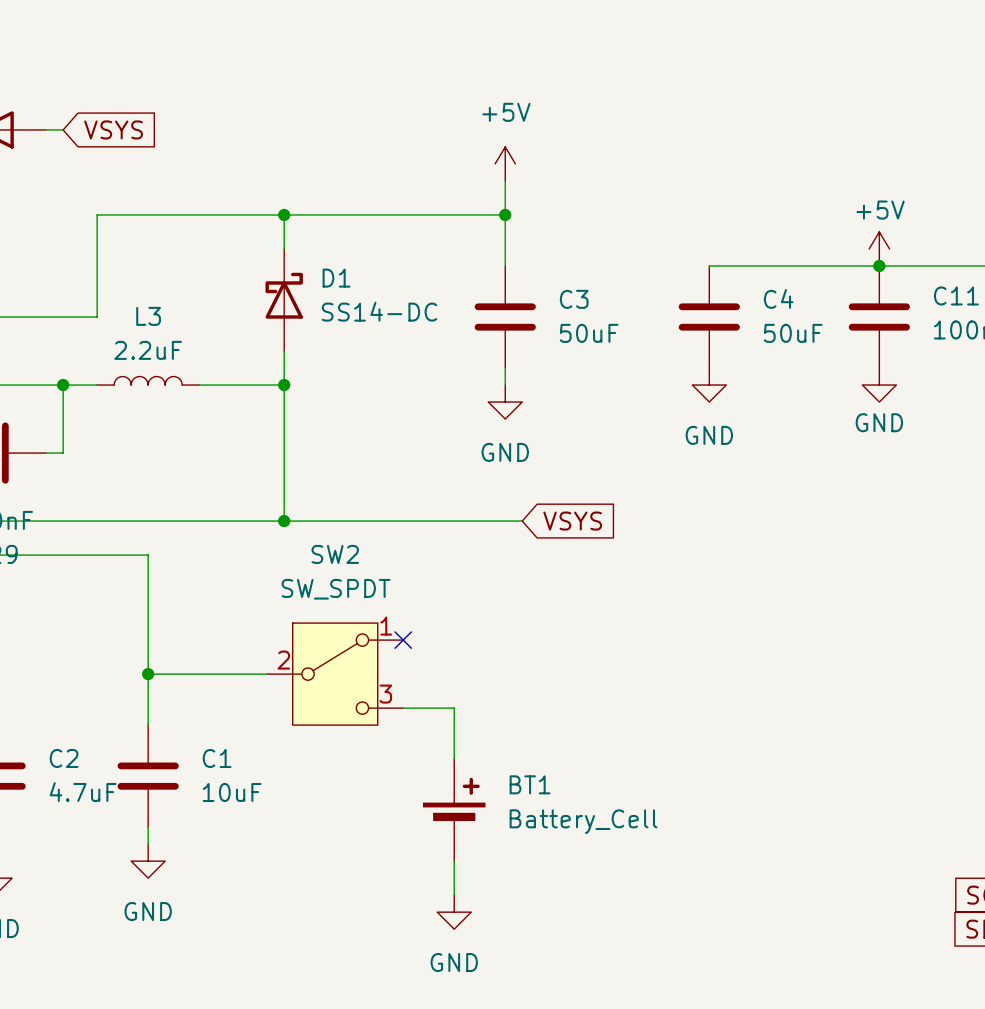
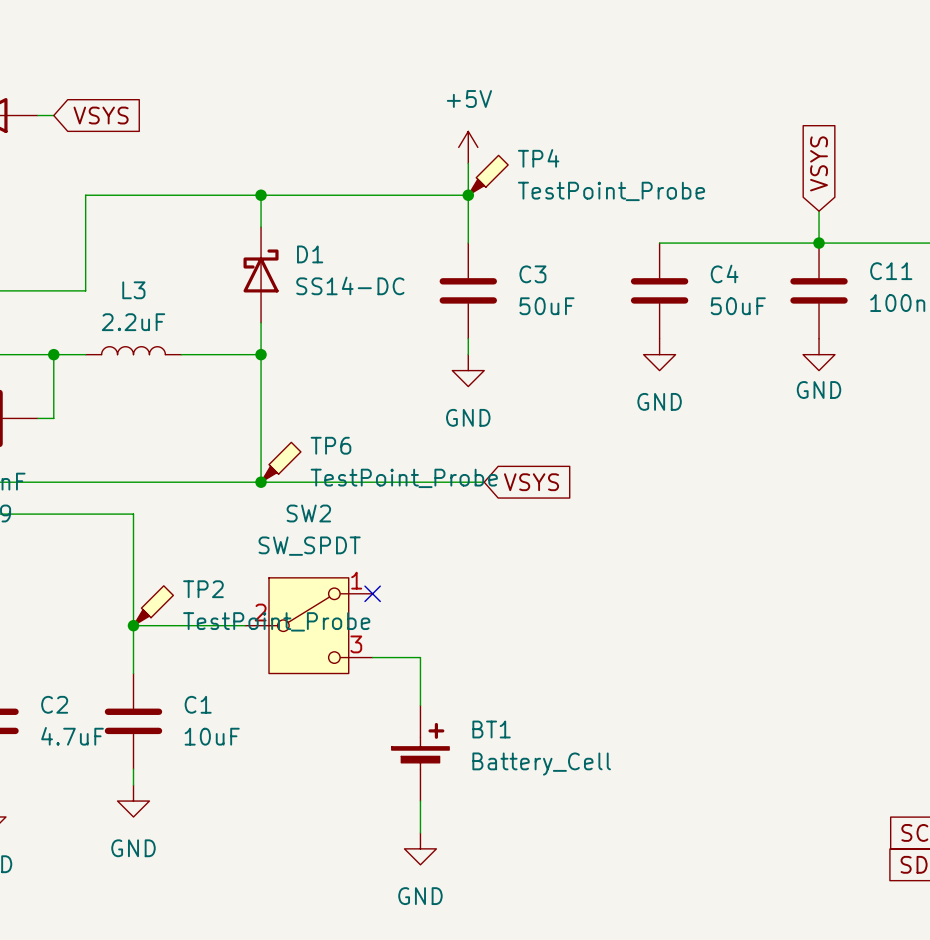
global label: none -> VSYS (819, 163)
TP4: none -> TestPoint_Probe (488, 175)
power symbol: +5V (879, 248) -> none
TP6: none -> TestPoint_Probe (280, 462)
TP2: none -> TestPoint_Probe (153, 605)

